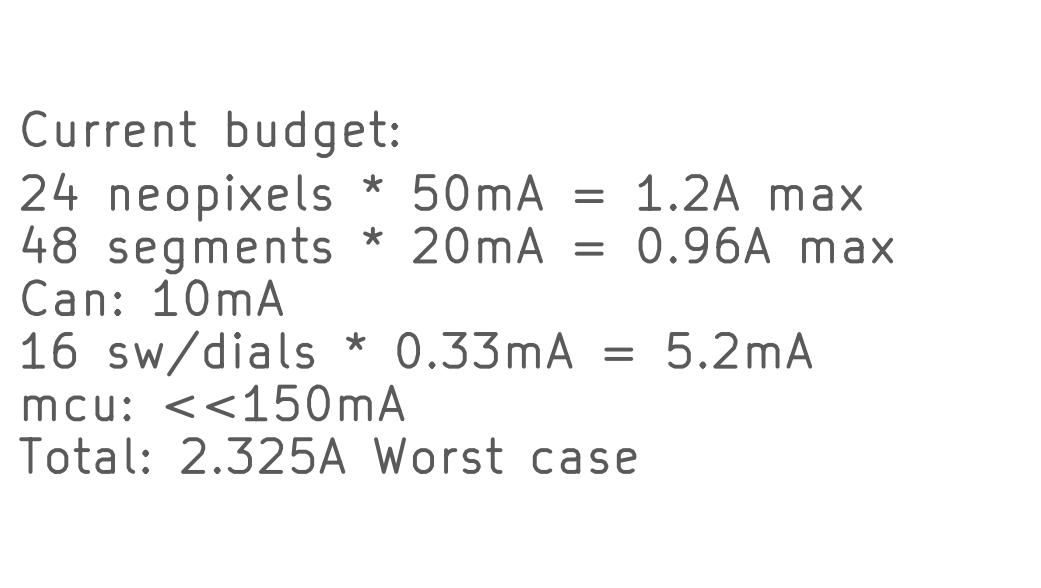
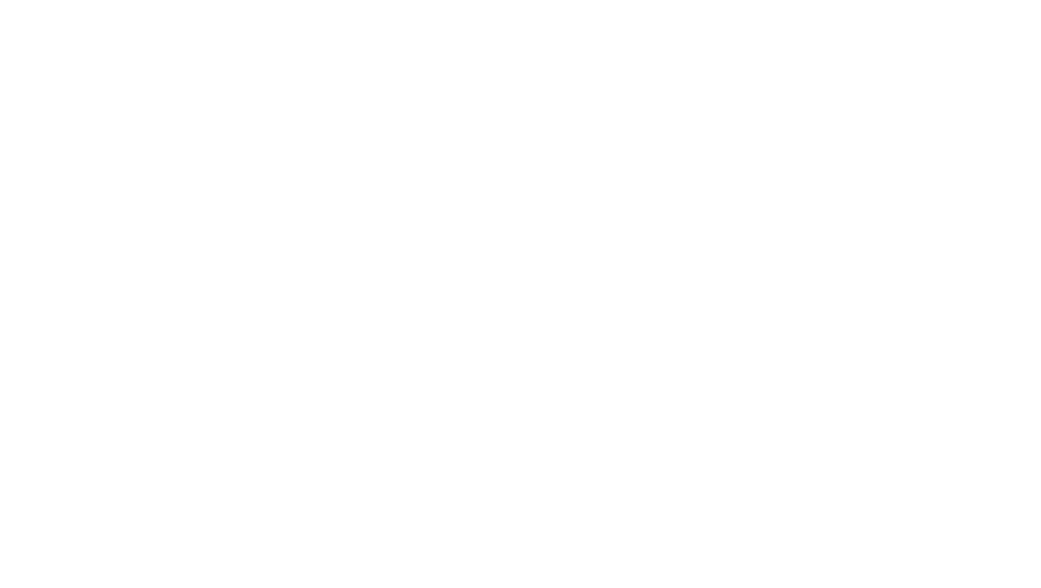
text: Current budget: (210, 134) -> none
text: 24 neopixels * 50mA = 1.2A max (441, 197) -> none
text: 48 segments * 20mA = 0.96A max (457, 249) -> none
text: Can: 10mA (152, 297) -> none
text: 16 sw/dials * 0.33mA = 5.2mA (417, 353) -> none
text: mcu: <<150mA (214, 402) -> none
text: Total: 2.325A Worst case (327, 455) -> none

